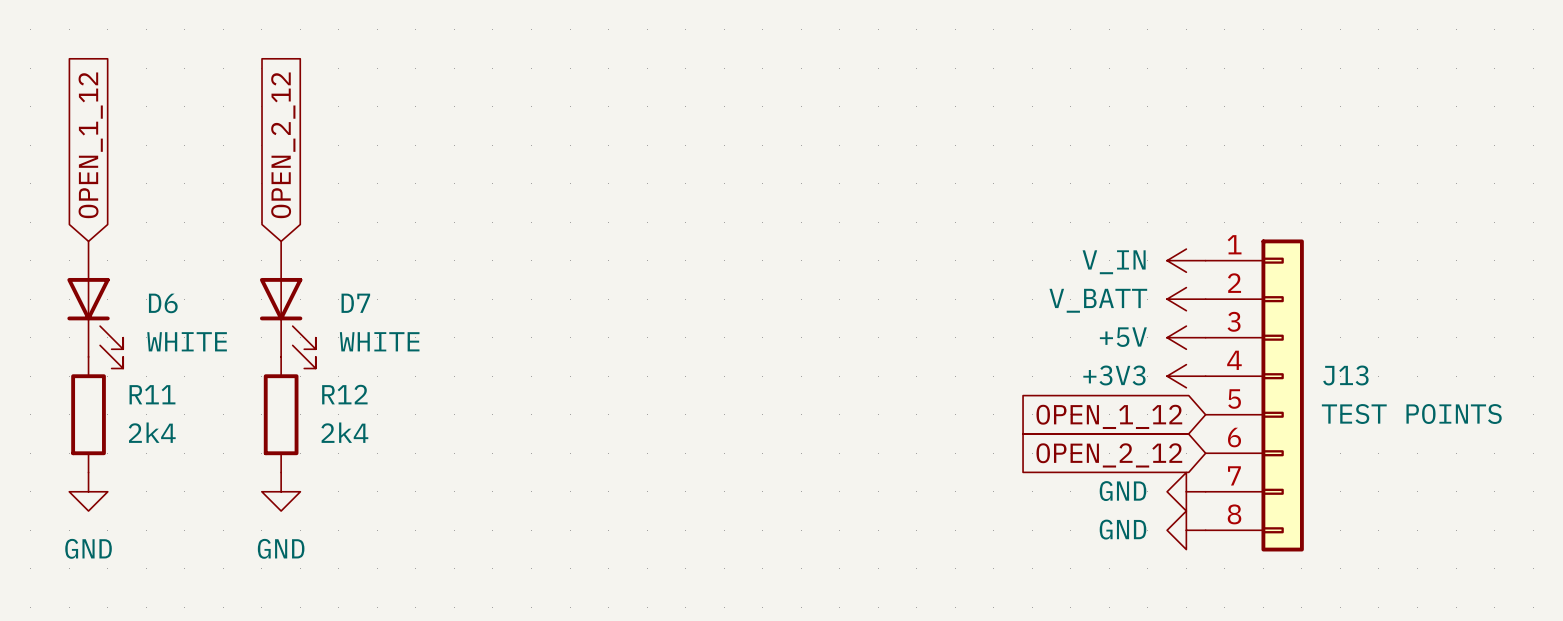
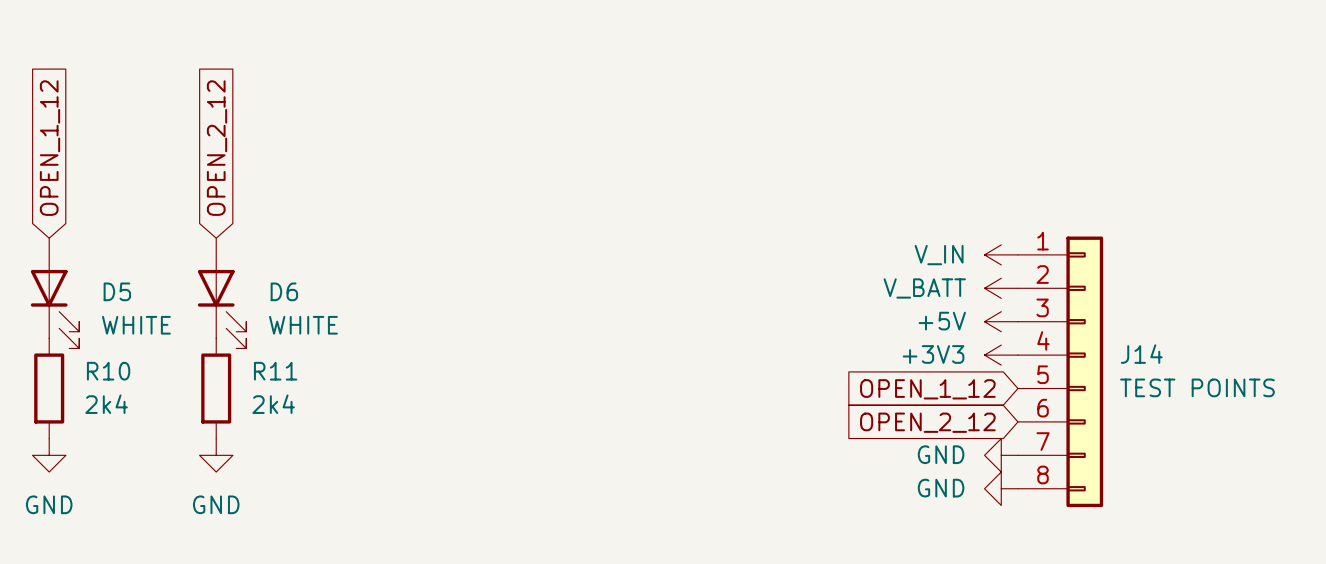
D6 name: D6 (163, 303) -> D5 (117, 291)
D7 name: D7 (355, 303) -> D6 (284, 291)
J13 name: J13 (1345, 375) -> J14 (1141, 354)
R11 name: R11 (152, 394) -> R10 (108, 371)
R12 name: R12 (344, 394) -> R11 (275, 371)

